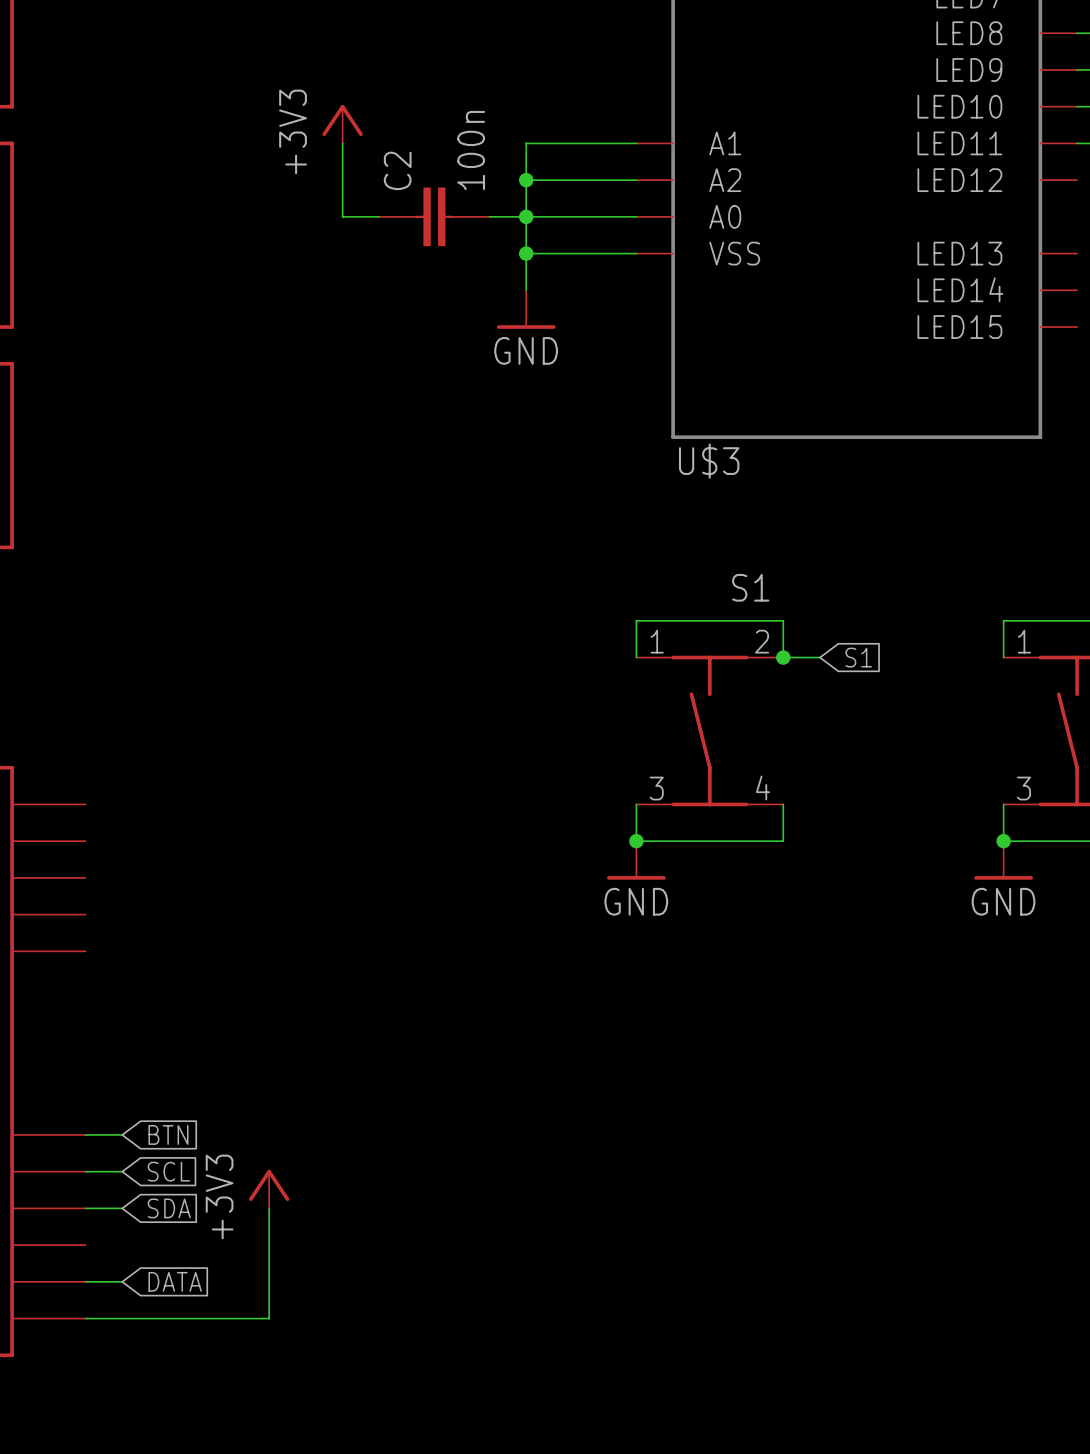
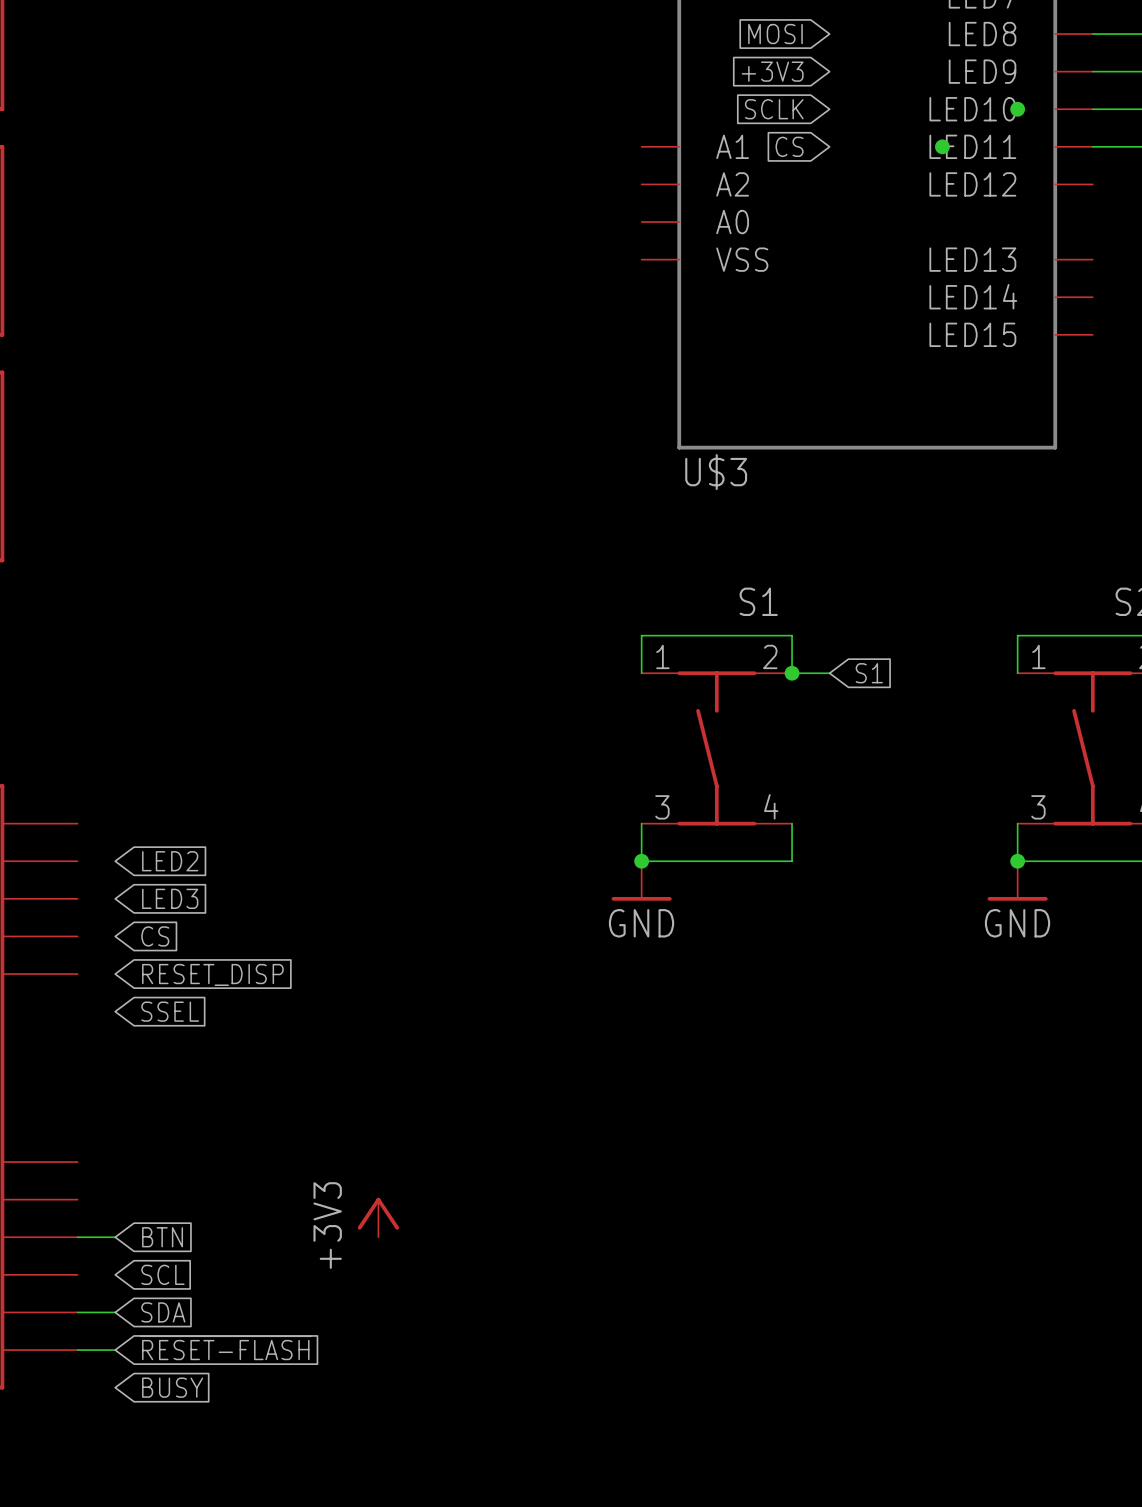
global label: none -> MOSI (775, 34)
global label: none -> +3V3 (772, 71)
global label: none -> SCLK (774, 109)
junction: none -> (1017, 109)
power symbol: +3V3 (342, 124) -> none
wire: (342, 143) (342, 216) (379, 216) -> none
wire: (636, 143) (526, 143) (526, 290) -> none
global label: none -> CS (789, 146)
junction: none -> (942, 146)
wire: (526, 180) (636, 180) -> none
junction: (526, 180) -> none
C2: 100n (434, 216) -> none
wire: (489, 216) (636, 216) -> none
junction: (526, 216) -> none
wire: (526, 253) (636, 253) -> none
junction: (526, 253) -> none
power symbol: GND (526, 309) -> none
global label: none -> LED2 (170, 861)
global label: none -> LED3 (170, 898)
global label: none -> CS (155, 936)
global label: none -> RESET_DISP (212, 974)
global label: none -> SSEL (170, 1011)
wire: (85, 1134) (122, 1134) -> none
global label: BTN (168, 1134) -> none
wire: (85, 1171) (122, 1171) -> none
global label position: SCL (168, 1171) -> SCL (162, 1274)
power symbol position: +3V3 (269, 1189) -> +3V3 (378, 1217)
global label: SDA (169, 1208) -> BTN (162, 1237)
wire: (269, 1208) (269, 1318) (122, 1318) -> none
global label: DATA (175, 1281) -> SDA (163, 1312)
global label: none -> ~{RESET-FLASH} (225, 1347)
global label: none -> BUSY (172, 1387)

